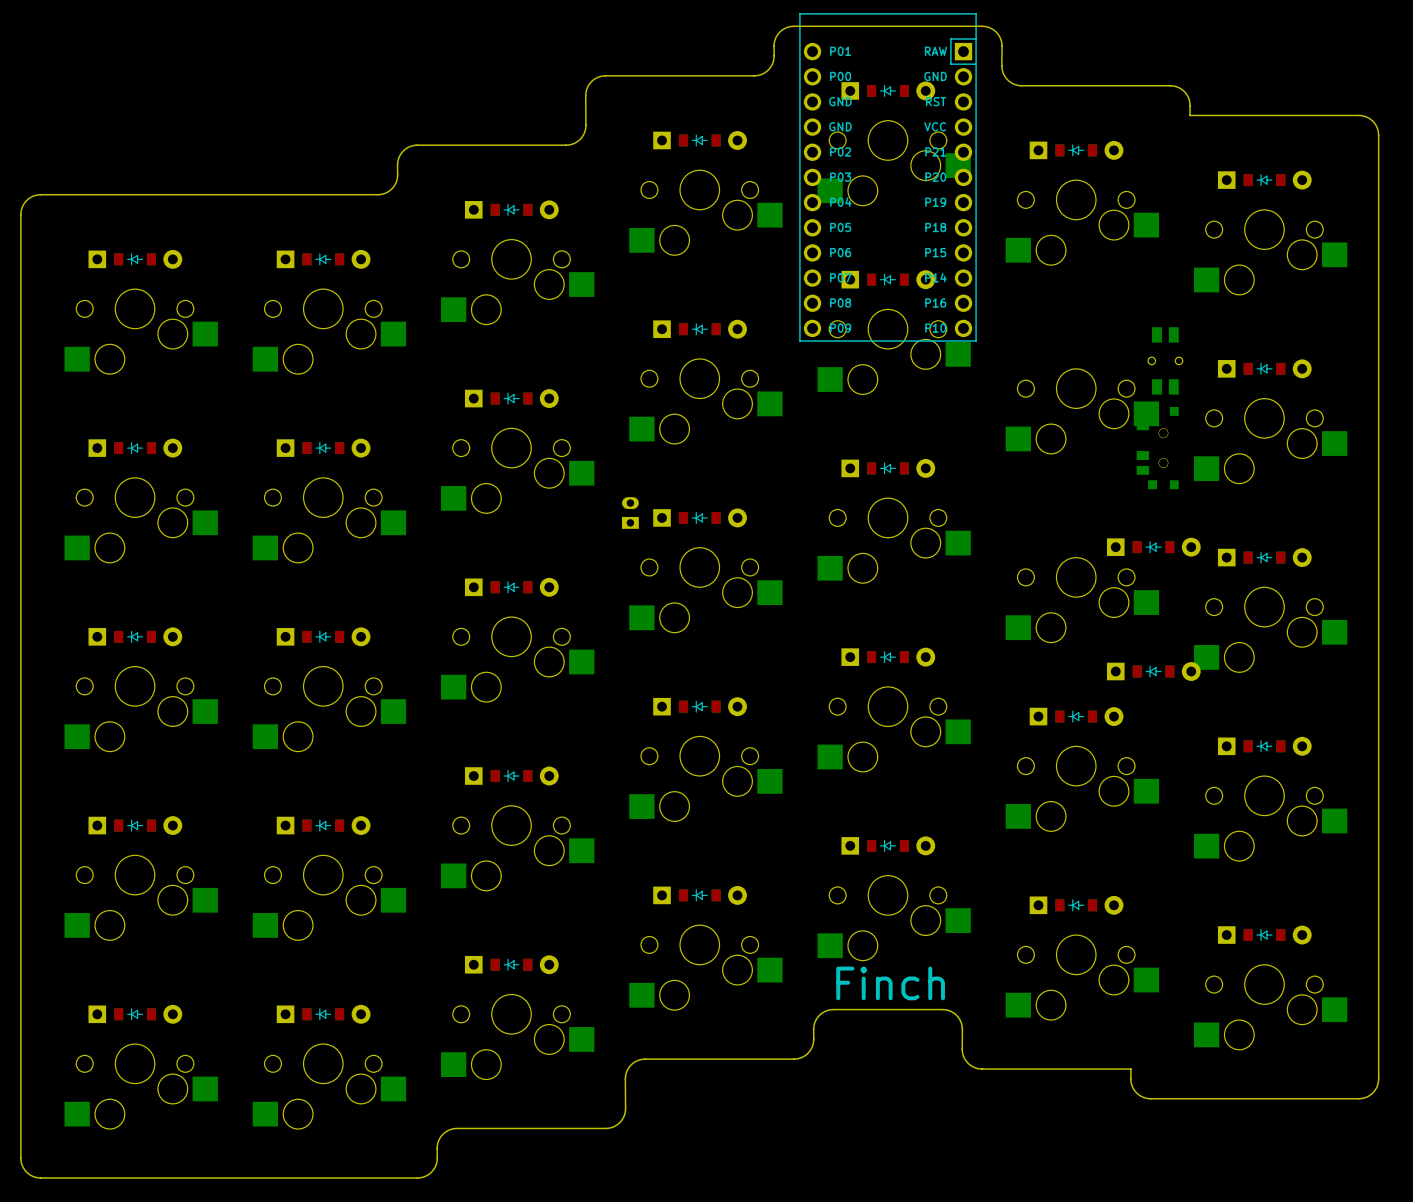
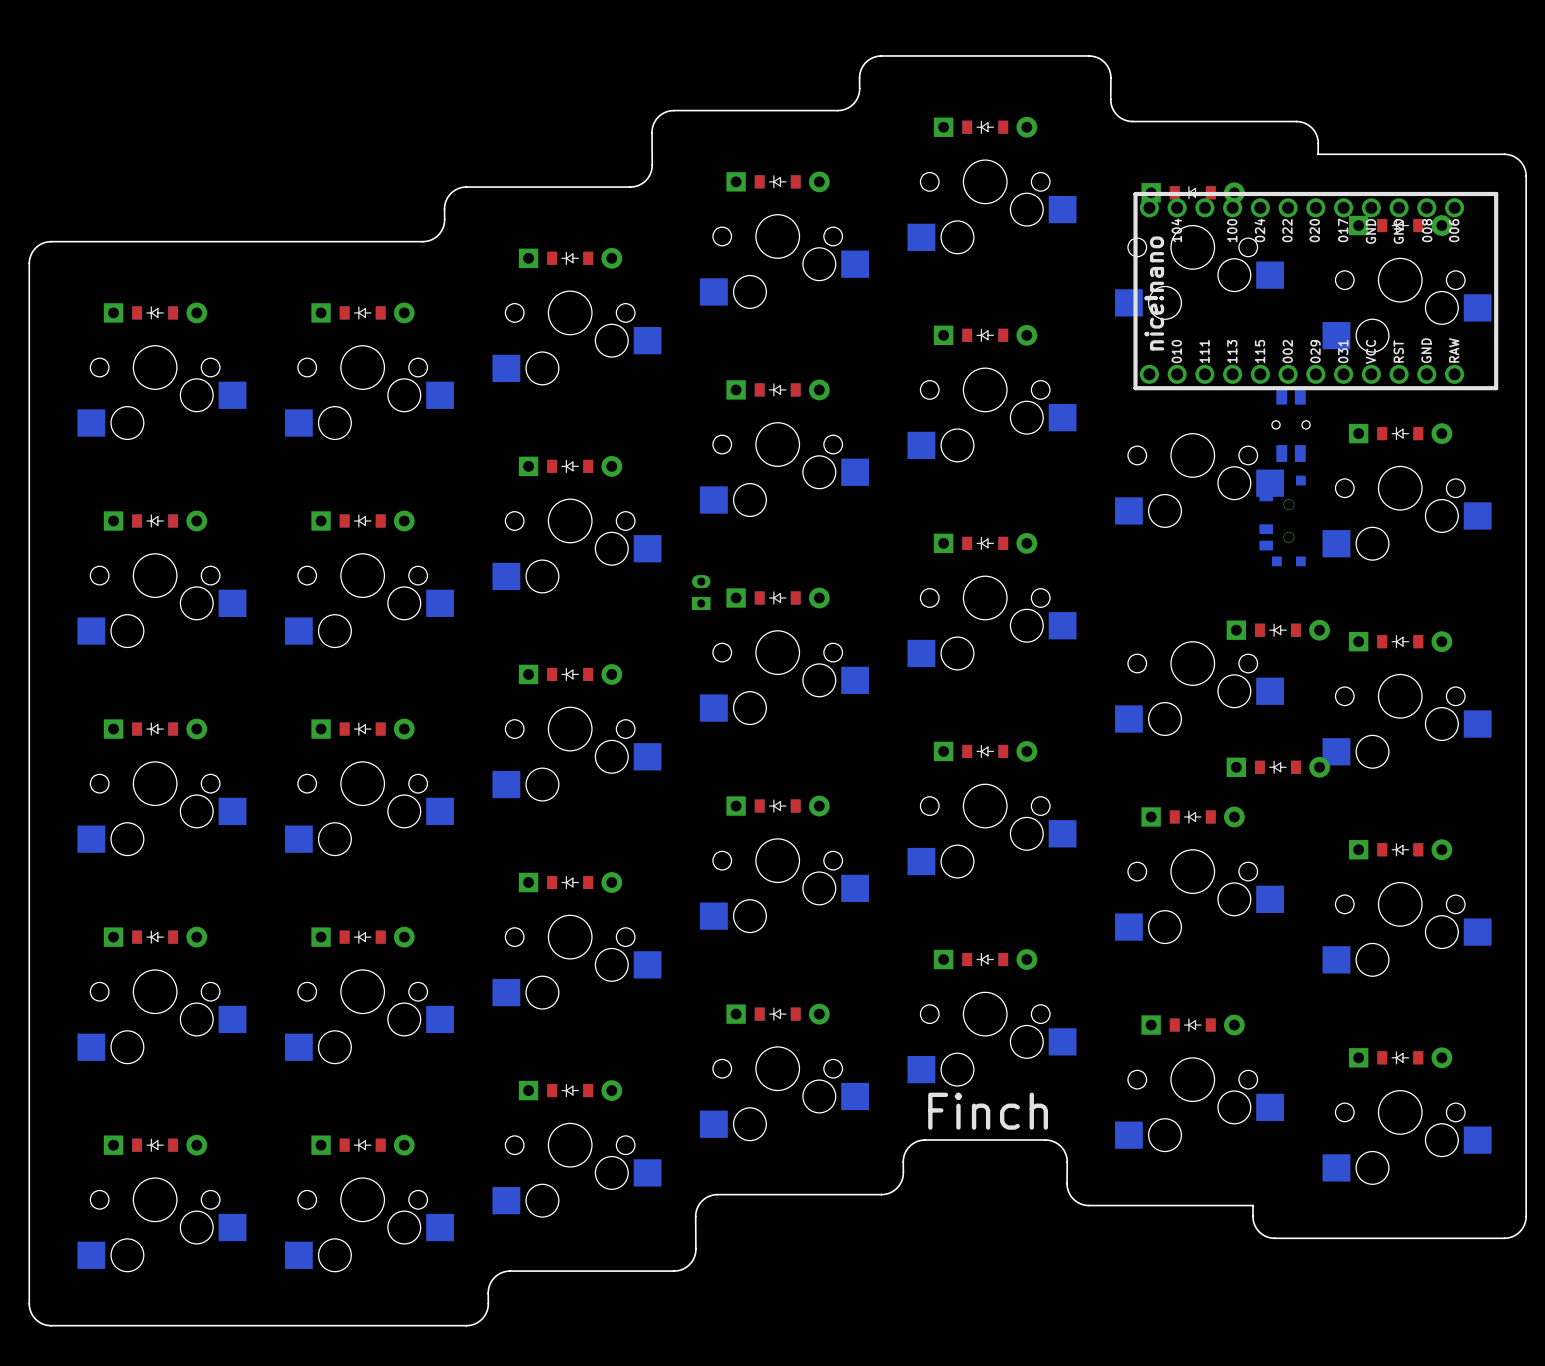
part: (888, 177) -> none
part: none -> (1315, 291)

